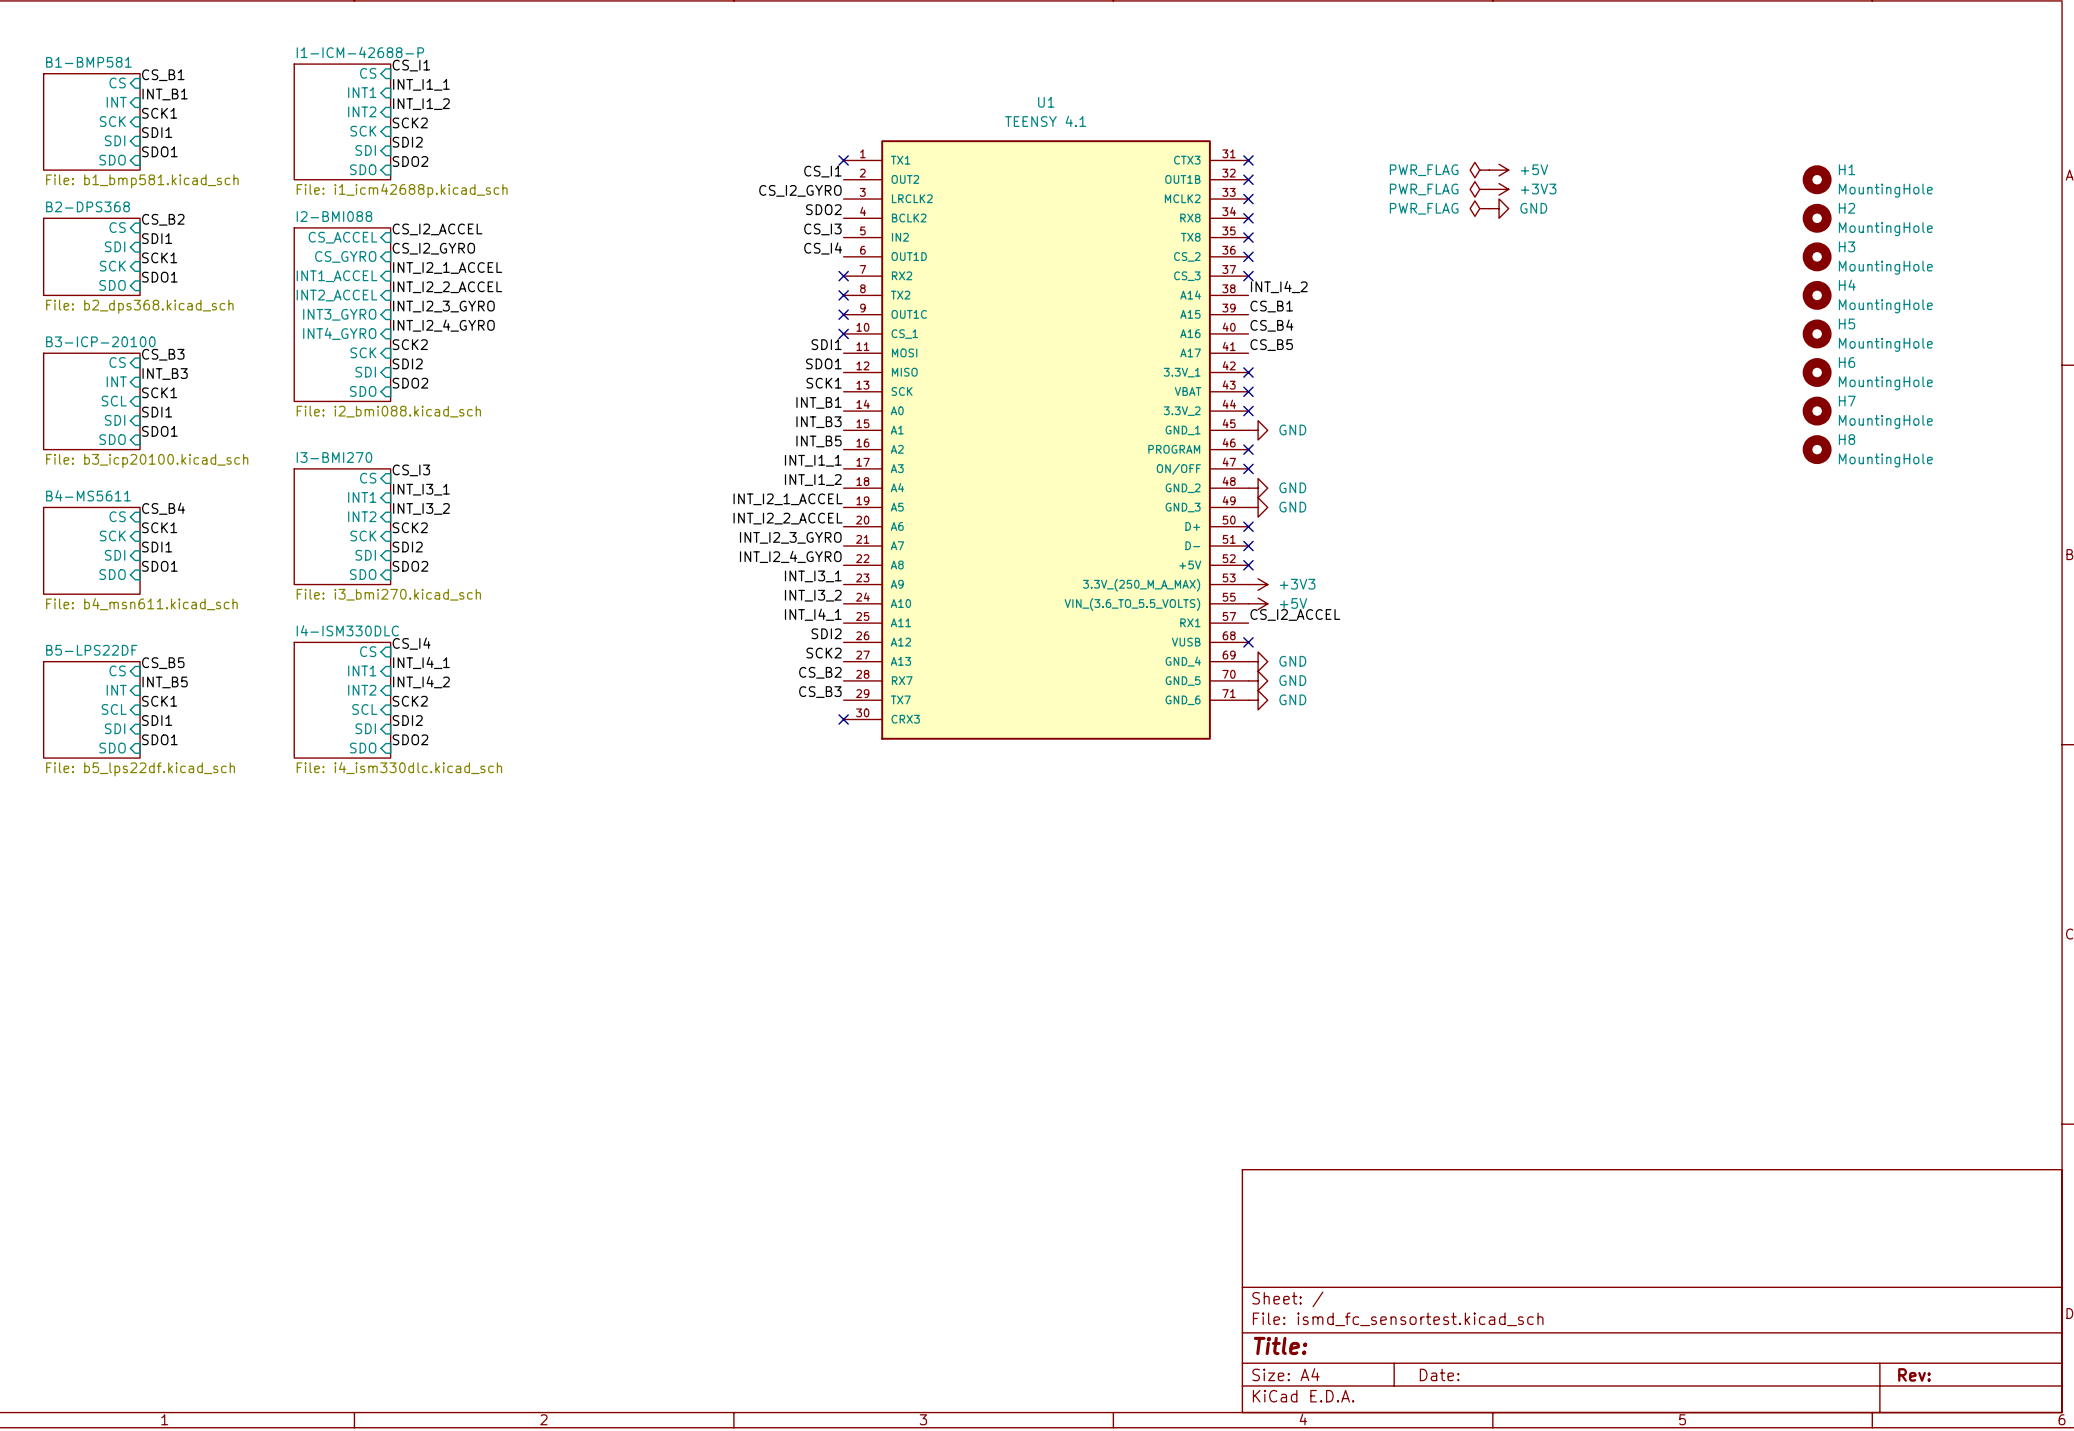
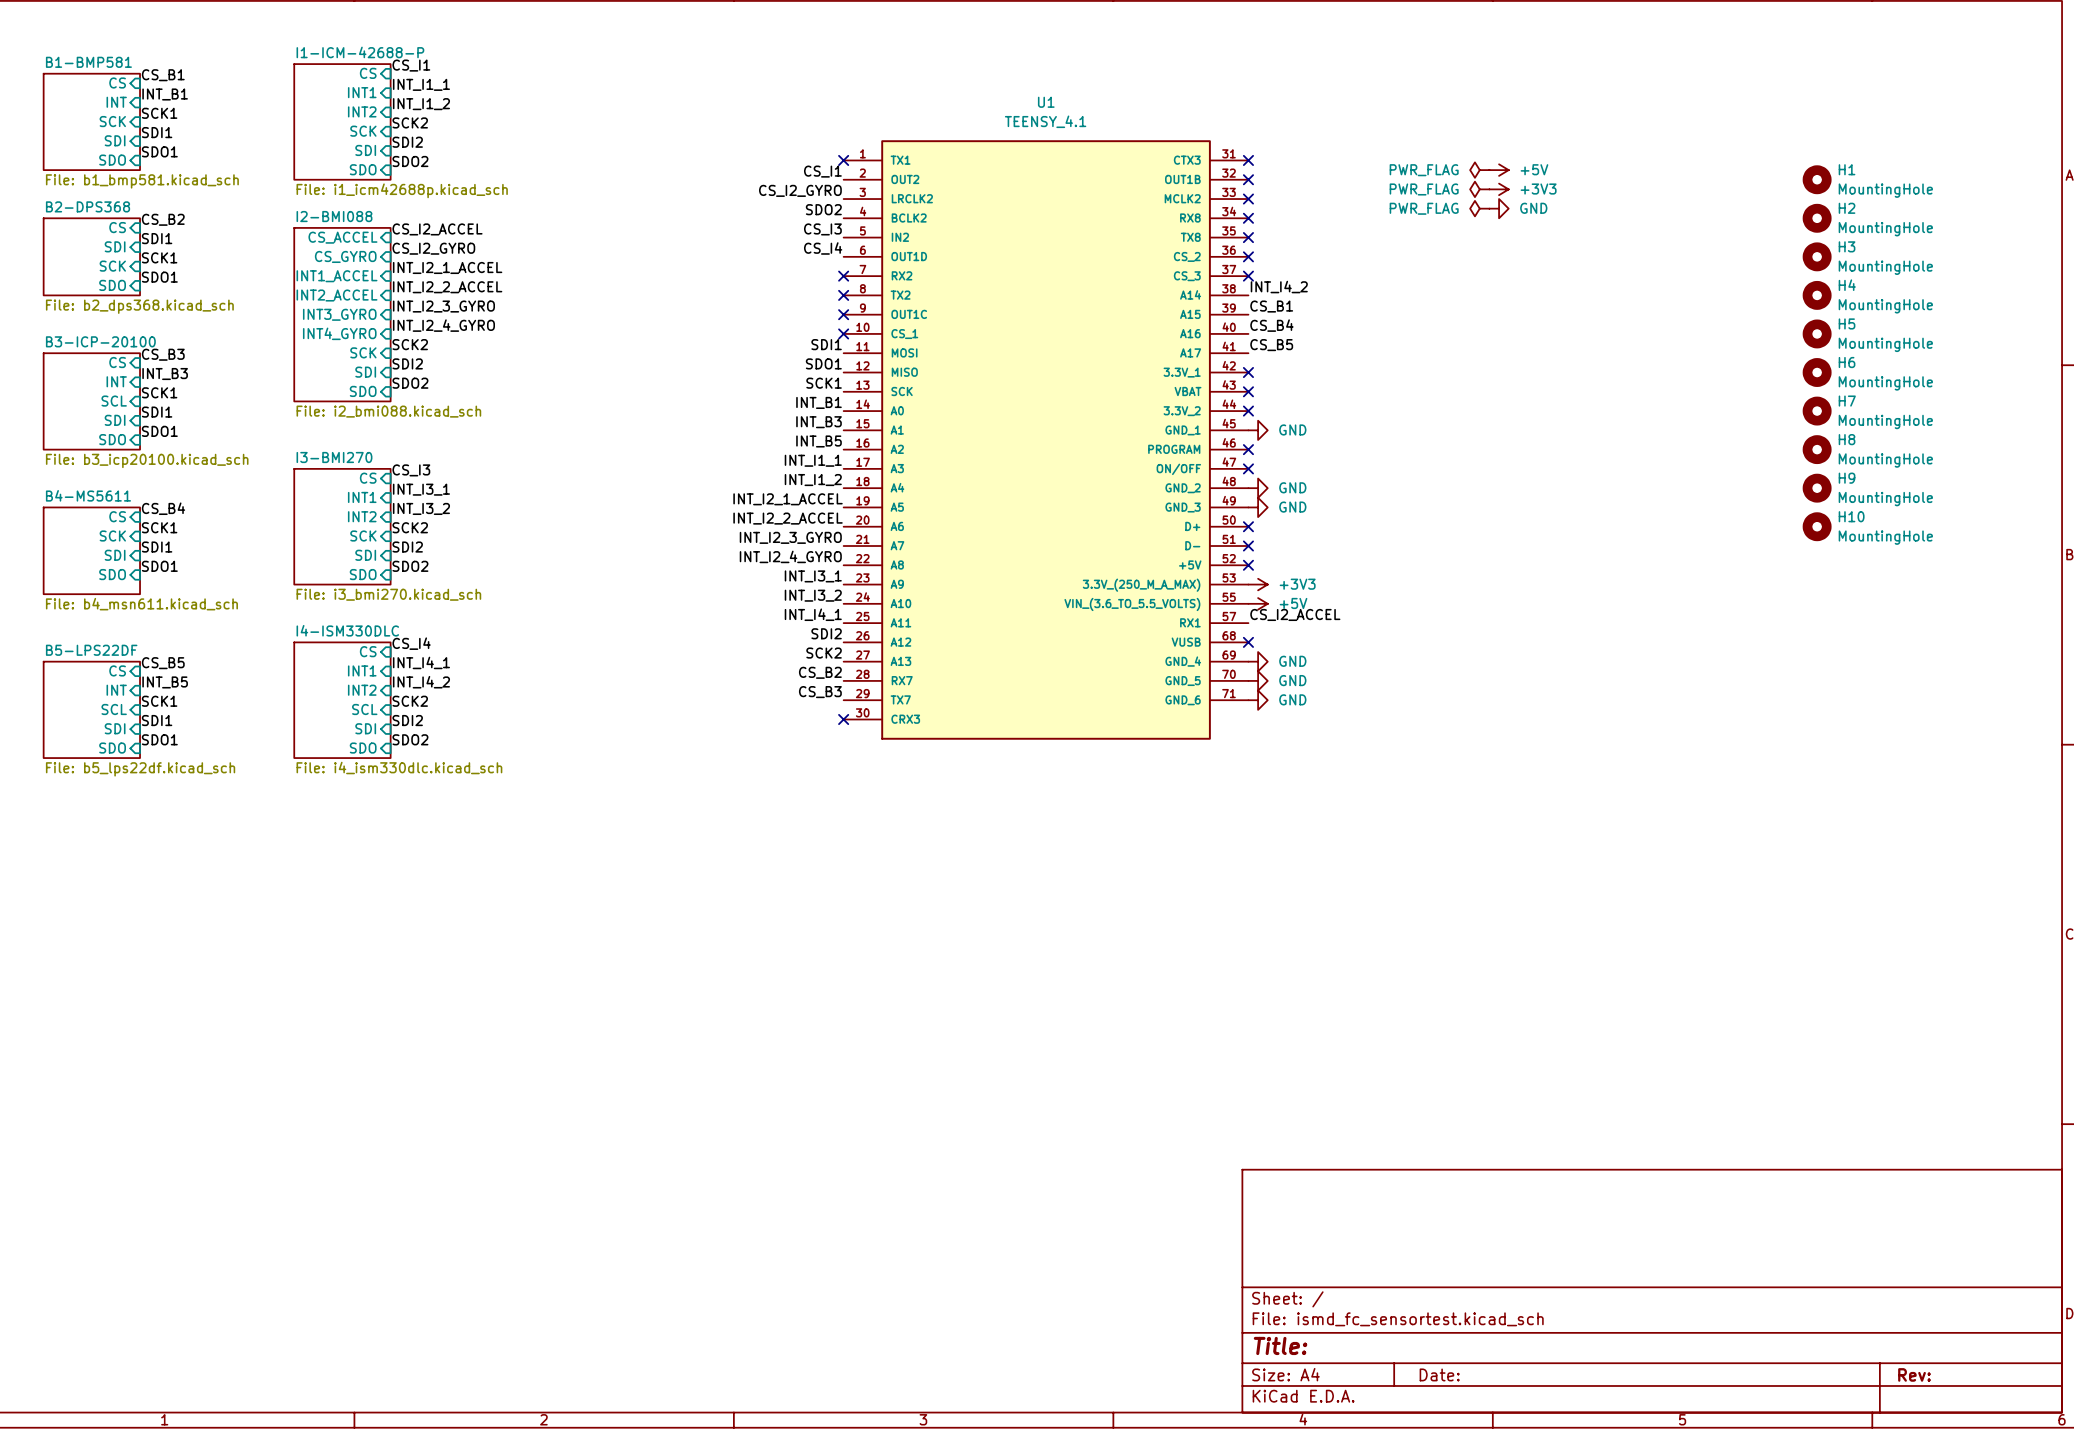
U1 value: TEENSY 4.1 (1045, 121) -> TEENSY_4.1 (1045, 121)
H9: none -> MountingHole (1817, 488)
H10: none -> MountingHole (1817, 526)

